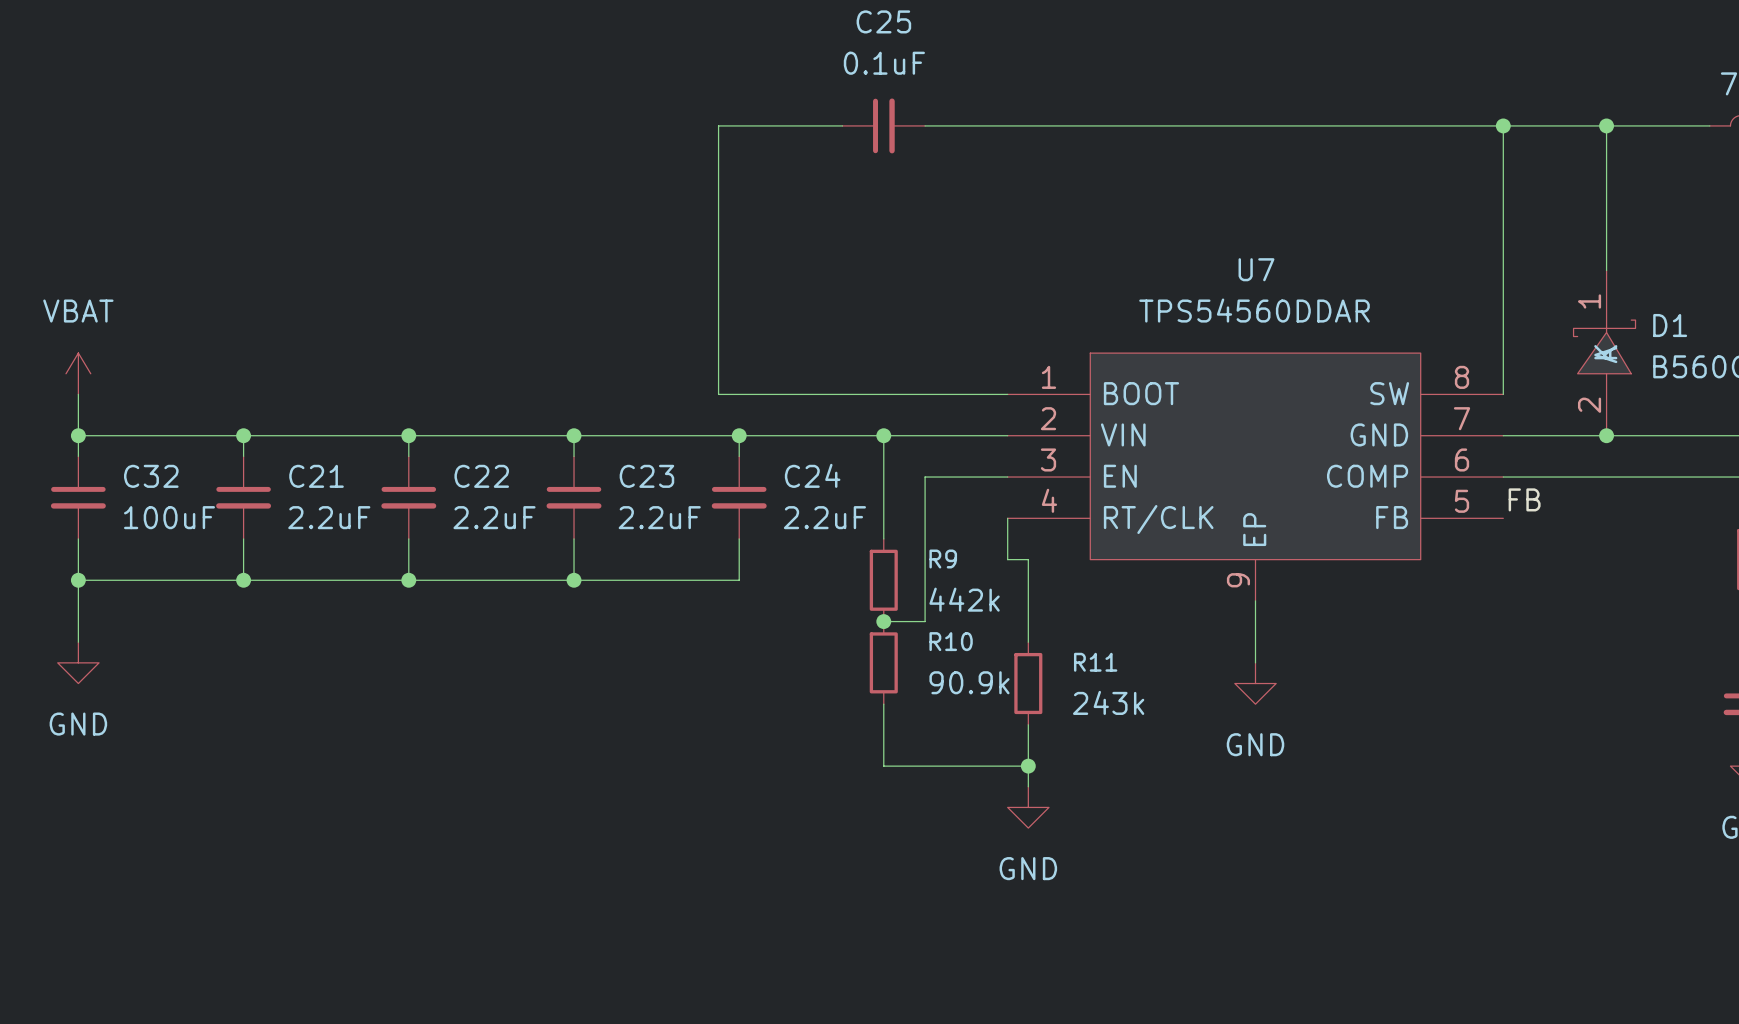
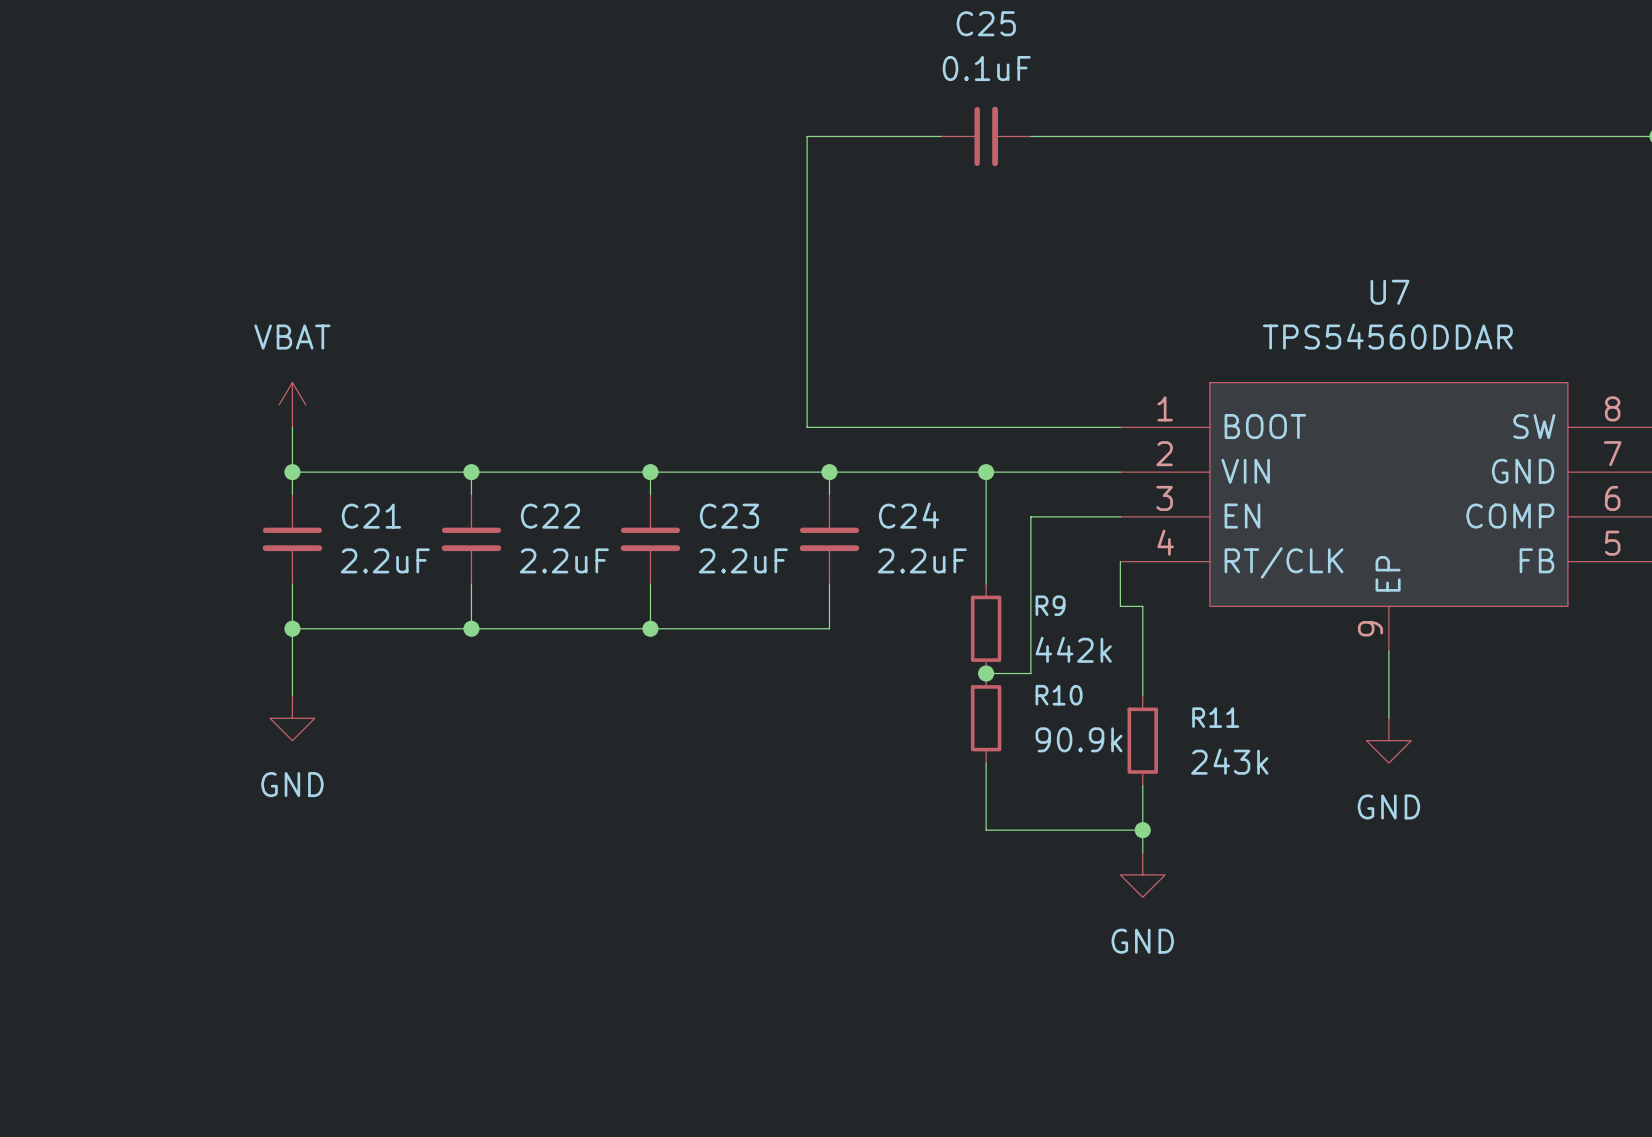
power symbol position: VBAT (78, 373) -> VBAT (292, 405)
wire: (78, 394) (78, 456) -> none
wire: (78, 435) (243, 435) -> (292, 427) (292, 472)
junction: (78, 435) -> none
C32: 100uF (78, 497) -> none
wire: (78, 538) (78, 642) -> none
wire: (78, 580) (243, 580) -> (292, 695) (292, 628)
junction: (78, 580) -> none
power symbol position: GND (78, 662) -> GND (292, 718)

